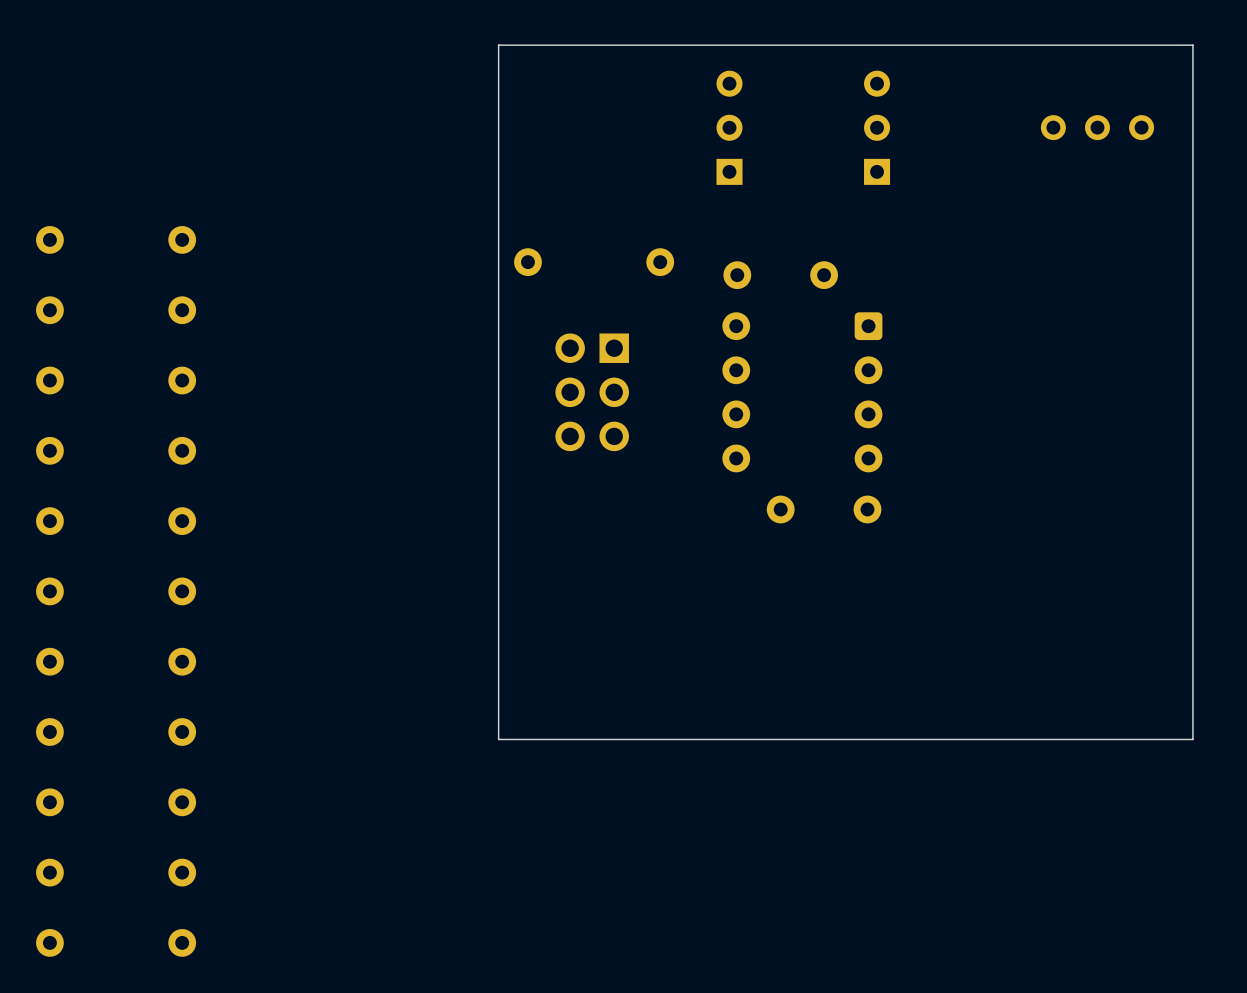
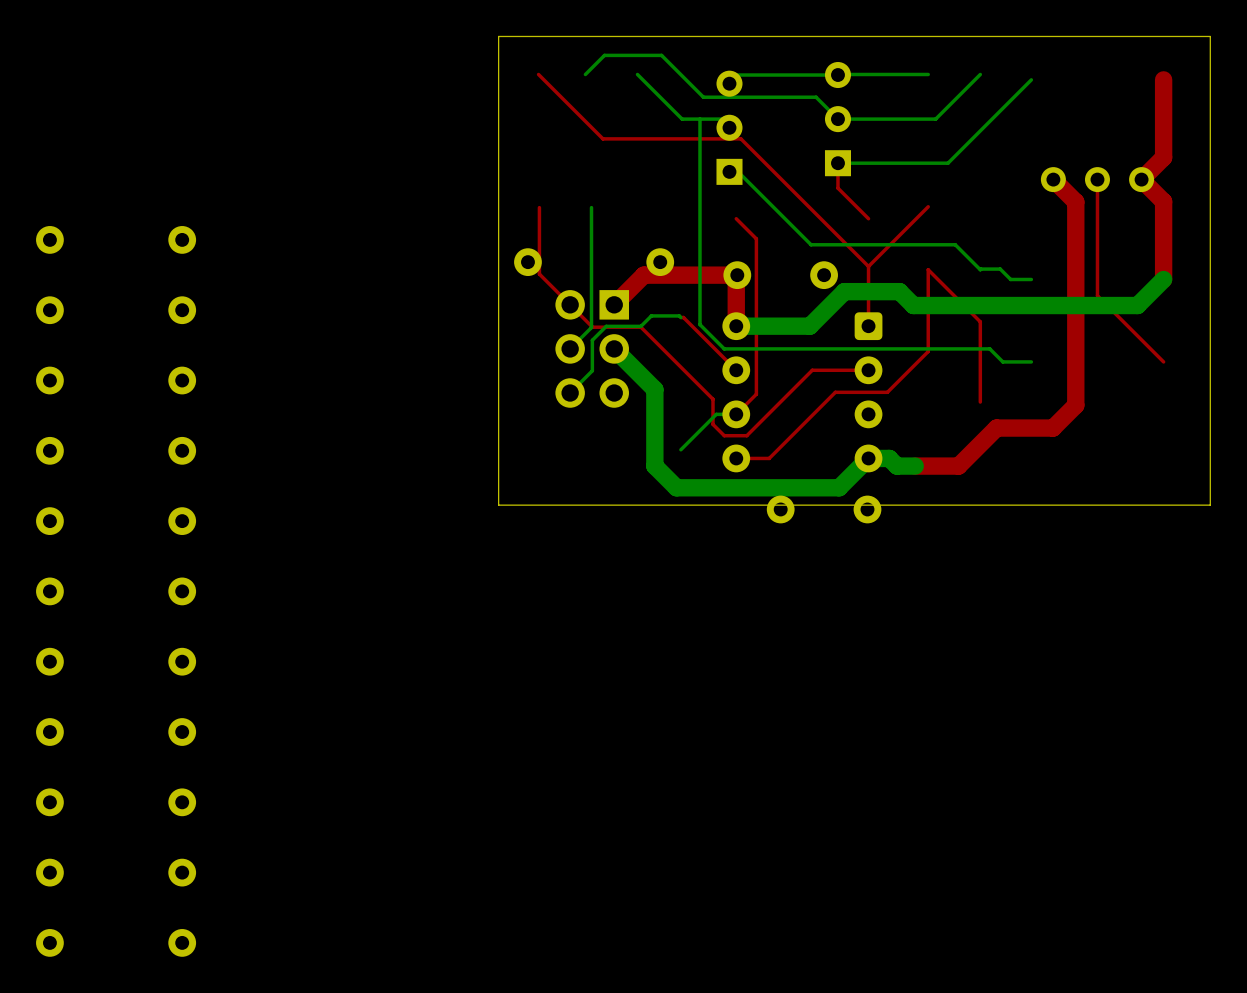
board edge: (498, 45) (1192, 45) (1192, 739) (498, 739) (498, 505) -> (498, 45) (498, 36) (1210, 36) (1210, 505) (498, 505)
top track: none -> (538, 74) (602, 138) (740, 138) (868, 266)
bottom track: none -> (637, 74) (682, 119) (729, 119)
bottom track: none -> (928, 74) (729, 75)
bottom track: none -> (980, 74) (935, 119) (837, 119) (816, 97) (703, 97) (661, 55) (604, 55) (585, 74)
bottom track: none -> (1031, 79) (948, 163) (837, 163)
top track: none -> (1163, 79) (1163, 157) (1141, 179) (1163, 201) (1163, 279)
bottom track: none -> (699, 119) (699, 324) (724, 348) (989, 348) (1002, 361) (1031, 361)
part position: (877, 127) -> (837, 119)
part position: (1097, 127) -> (1097, 179)
bottom track: none -> (729, 163) (811, 244) (955, 244) (980, 269) (1000, 269) (1010, 279) (1031, 279)
top track: none -> (837, 163) (837, 188) (868, 218)
top track: none -> (1053, 179) (1075, 201) (1075, 405) (1053, 428) (996, 428) (958, 466) (915, 466)
top track: none -> (1097, 179) (1097, 295) (1163, 361)
top track: none -> (928, 206) (868, 266)
top track: none -> (539, 207) (539, 274) (592, 327) (640, 327) (713, 399) (713, 424) (724, 435) (746, 435) (812, 370) (868, 370)
bottom track: none -> (591, 207) (591, 327) (570, 348)
top track: none -> (736, 218) (756, 238) (756, 394) (736, 414)
top track: none -> (868, 266) (868, 326)
bottom track: none -> (1163, 279) (1137, 305) (913, 305) (899, 291) (844, 291) (809, 326) (736, 326)
top track: none -> (614, 304) (643, 275) (737, 275) (736, 326)
top track: none -> (680, 317) (683, 317) (736, 370)
bottom track: none -> (680, 317) (651, 315) (640, 326) (606, 326) (592, 340) (592, 370) (570, 393)
bottom track: none -> (614, 348) (654, 389) (654, 466) (676, 487) (839, 487) (868, 458) (889, 458) (897, 466) (915, 466)
part position: (592, 392) -> (592, 348)
top track: none -> (980, 402) (980, 321) (928, 269) (928, 351) (887, 392) (835, 392) (769, 458) (736, 458)
bottom track: none -> (736, 414) (716, 414) (680, 449)

